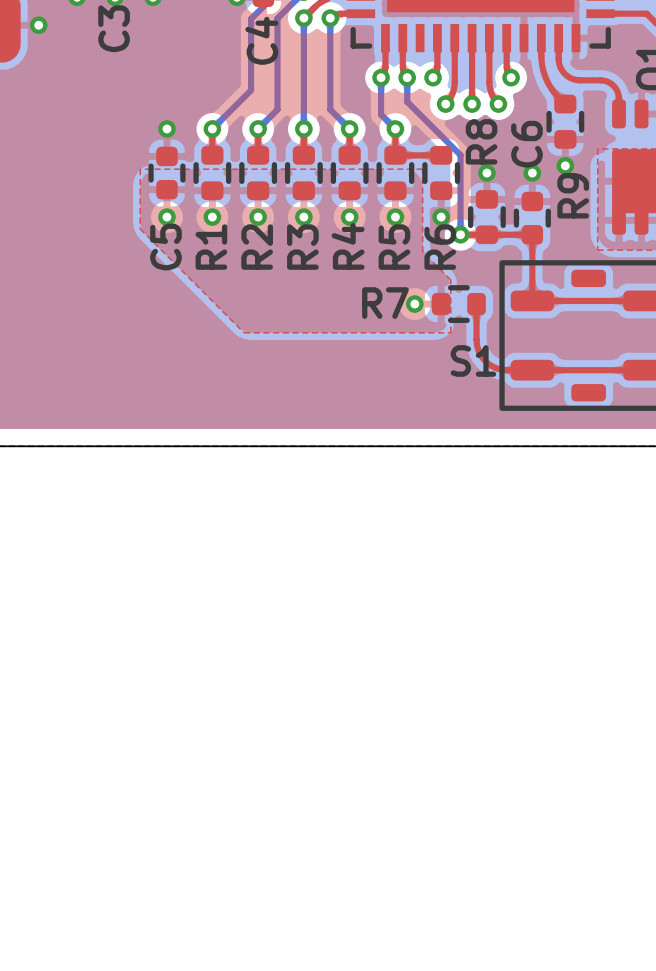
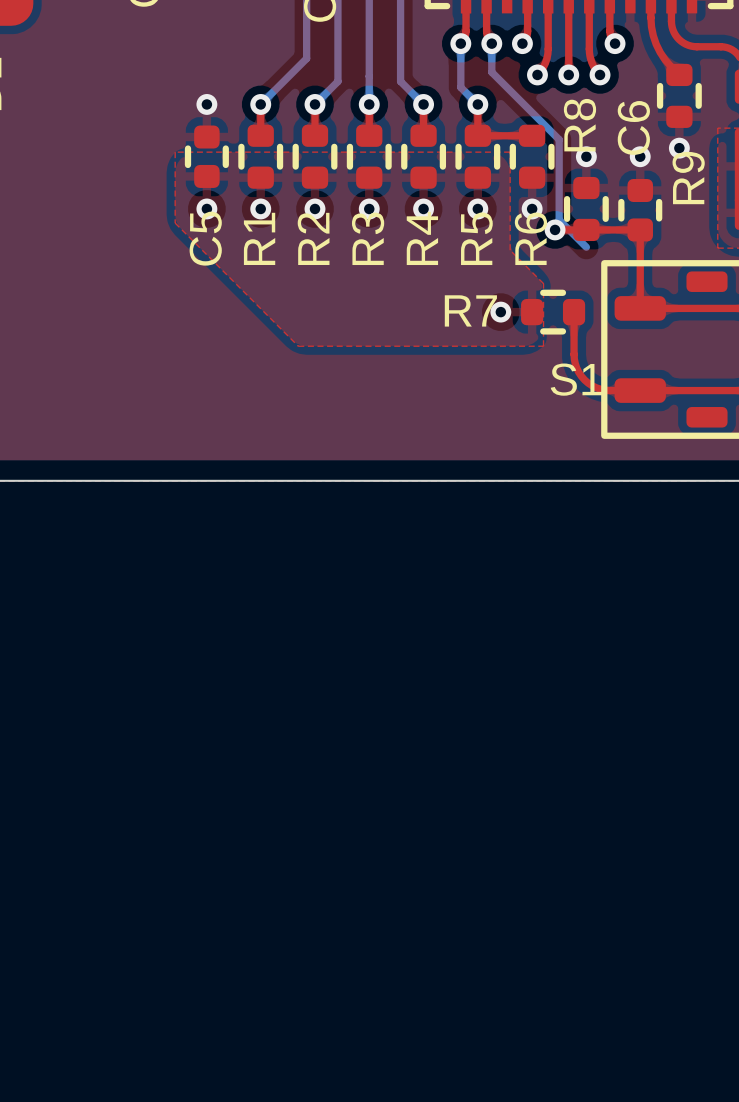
bottom track: (460, 155) (460, 234) -> (555, 135) (559, 139) (559, 220) (586, 247)

